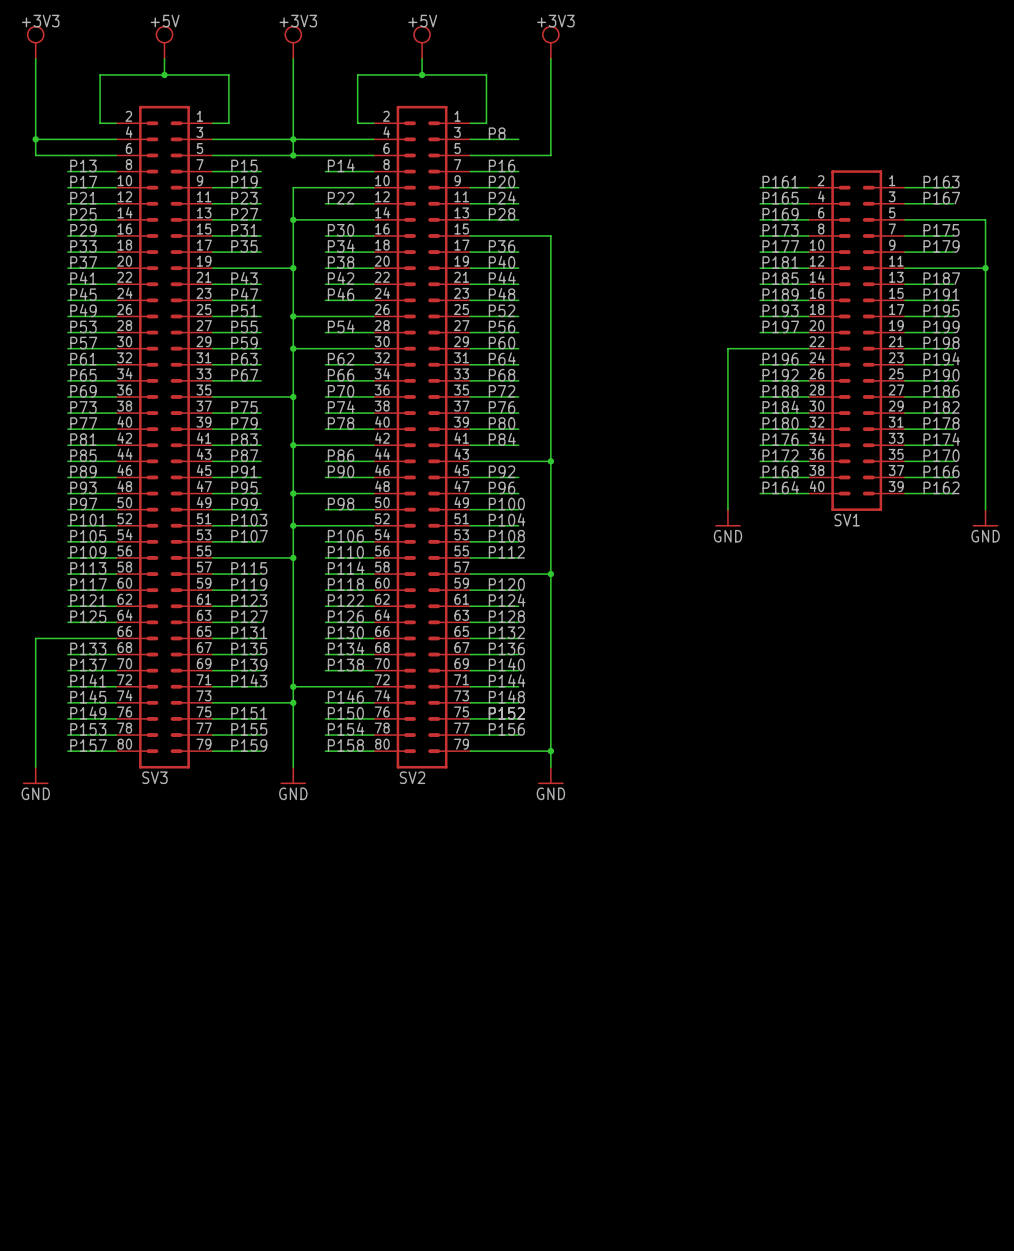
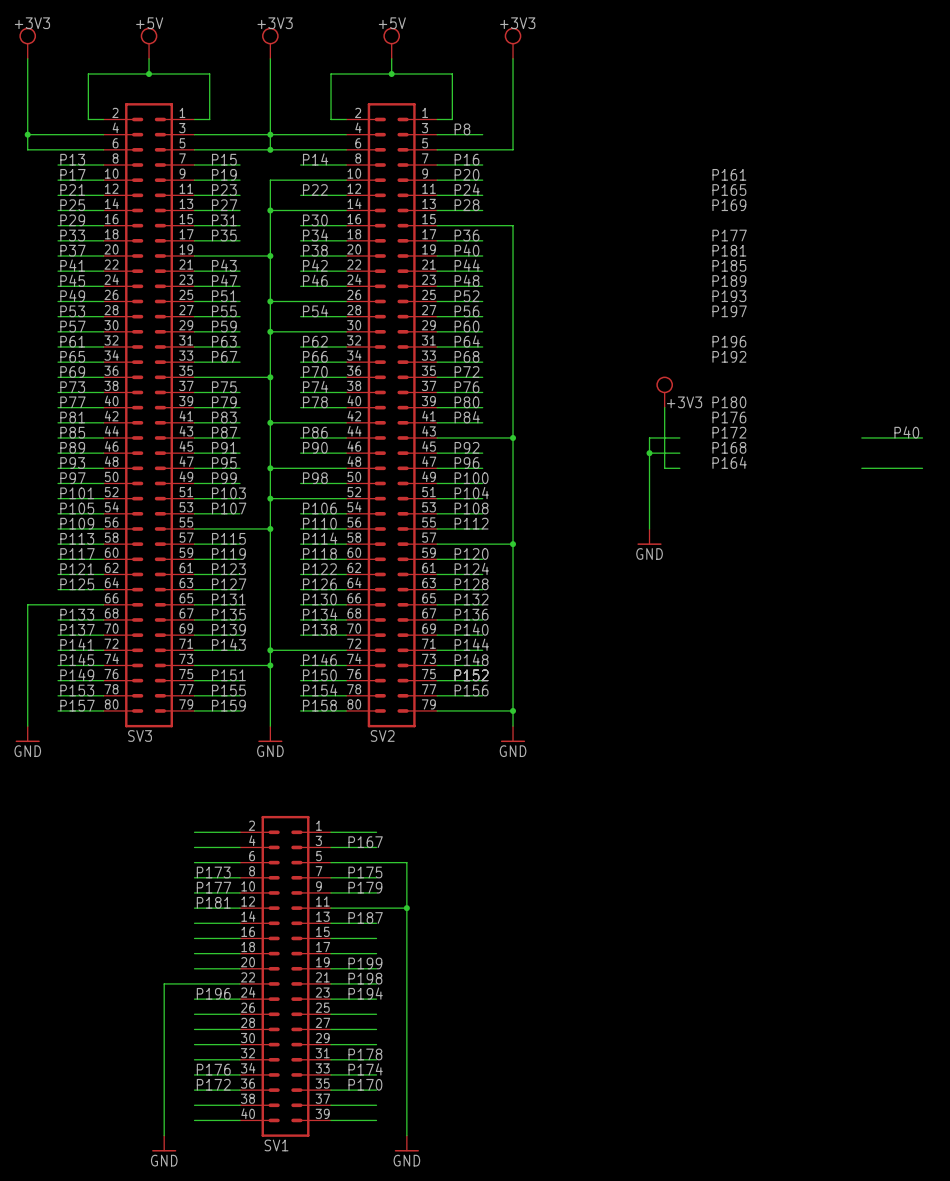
label: P163 (941, 182) -> none
wire: (760, 187) (808, 187) -> none
wire: (905, 187) (953, 187) -> none
label: P167 (941, 198) -> none
wire: (760, 203) (808, 203) -> none
wire: (905, 203) (953, 203) -> none
wire: (760, 219) (808, 219) -> none
wire: (905, 219) (985, 219) (985, 509) -> none
label: P173 (780, 230) -> none
label: P175 (941, 230) -> none
wire: (760, 235) (808, 235) -> none
wire: (905, 235) (953, 235) -> none
label: P179 (941, 246) -> none
wire: (760, 252) (808, 252) -> none
wire: (905, 252) (953, 252) -> none
wire: (760, 268) (808, 268) -> none
wire: (905, 268) (985, 268) -> none
junction: (985, 268) -> none
label: P187 (941, 278) -> none
wire: (760, 284) (808, 284) -> none
wire: (905, 284) (953, 284) -> none
label: P191 (941, 294) -> none
wire: (760, 300) (808, 300) -> none
wire: (905, 300) (953, 300) -> none
label: P195 (941, 310) -> none
wire: (760, 316) (808, 316) -> none
wire: (905, 316) (953, 316) -> none
label: P199 (941, 326) -> none
wire: (760, 332) (808, 332) -> none
wire: (905, 332) (953, 332) -> none
SV1 position: (856, 340) -> (285, 976)
label: P198 (941, 343) -> none
wire: (808, 348) (727, 348) (727, 509) -> none
wire: (905, 348) (953, 348) -> none
label: P194 (941, 358) -> none
wire: (760, 364) (808, 364) -> none
wire: (905, 364) (953, 364) -> none
label: P190 (941, 375) -> none
wire: (760, 380) (808, 380) -> none
wire: (905, 380) (953, 380) -> none
label: P188 (780, 391) -> none
label: P186 (941, 391) -> none
wire: (760, 396) (808, 396) -> none
wire: (905, 396) (953, 396) -> none
label: P184 (780, 407) -> none
label: P182 (941, 407) -> none
power symbol: none -> (664, 392)
wire: (760, 413) (808, 413) -> none
wire: (905, 413) (953, 413) -> none
label: none -> +3V3 (684, 402)
label: P178 (941, 423) -> none
wire: none -> (664, 407) (664, 468) (679, 468)
wire: (760, 429) (808, 429) -> none
wire: (905, 429) (953, 429) -> none
label: P174 (941, 439) -> none
wire: (760, 445) (808, 445) -> none
wire: (905, 445) (953, 445) -> none
label: P170 (941, 455) -> none
label: none -> P40 (906, 432)
wire: none -> (679, 437) (649, 437) (649, 528)
wire: (760, 461) (808, 461) -> none
wire: (905, 461) (921, 461) -> none
wire: none -> (892, 437) (922, 437)
label: P166 (941, 471) -> none
wire: none -> (649, 453) (679, 453)
junction: none -> (649, 453)
wire: (760, 477) (808, 477) -> none
wire: (905, 477) (953, 477) -> none
label: P162 (941, 487) -> none
wire: (760, 493) (808, 493) -> none
wire: (905, 493) (921, 493) -> none
wire: none -> (892, 468) (922, 468)
power symbol position: GND (727, 518) -> GND (649, 536)
power symbol: GND (985, 518) -> none
wire: none -> (194, 832) (240, 832)
wire: none -> (331, 832) (376, 832)
label: none -> P167 (365, 842)
wire: none -> (194, 847) (240, 847)
wire: none -> (331, 847) (376, 847)
wire: none -> (194, 862) (240, 862)
wire: none -> (331, 862) (406, 862) (406, 1135)
label: none -> P173 (213, 872)
label: none -> P175 (365, 872)
wire: none -> (194, 877) (240, 877)
wire: none -> (331, 877) (376, 877)
label: none -> P177 (213, 887)
label: none -> P179 (365, 887)
wire: none -> (194, 892) (240, 892)
wire: none -> (331, 892) (376, 892)
label: none -> P181 (213, 902)
wire: none -> (194, 908) (240, 908)
wire: none -> (331, 908) (406, 908)
junction: none -> (406, 908)
label: none -> P187 (365, 917)
wire: none -> (194, 923) (240, 923)
wire: none -> (331, 923) (376, 923)
wire: none -> (194, 938) (240, 938)
wire: none -> (331, 938) (376, 938)
wire: none -> (194, 953) (240, 953)
wire: none -> (331, 953) (376, 953)
label: none -> P199 (365, 963)
wire: none -> (194, 968) (240, 968)
wire: none -> (331, 968) (376, 968)
label: none -> P198 (365, 978)
wire: none -> (240, 983) (164, 983) (164, 1135)
wire: none -> (331, 983) (376, 983)
label: none -> P196 (213, 993)
label: none -> P194 (365, 993)
wire: none -> (194, 999) (240, 999)
wire: none -> (331, 999) (376, 999)
wire: none -> (194, 1014) (240, 1014)
wire: none -> (331, 1014) (376, 1014)
wire: none -> (194, 1029) (240, 1029)
wire: none -> (331, 1029) (376, 1029)
wire: none -> (194, 1044) (240, 1044)
wire: none -> (331, 1044) (376, 1044)
label: none -> P178 (365, 1054)
wire: none -> (194, 1059) (240, 1059)
wire: none -> (331, 1059) (376, 1059)
label: none -> P176 (213, 1069)
label: none -> P174 (365, 1069)
wire: none -> (194, 1074) (240, 1074)
wire: none -> (331, 1074) (376, 1074)
label: none -> P172 (213, 1084)
label: none -> P170 (365, 1084)
wire: none -> (194, 1090) (240, 1090)
wire: none -> (331, 1090) (376, 1090)
wire: none -> (194, 1105) (240, 1105)
wire: none -> (331, 1105) (376, 1105)
wire: none -> (194, 1120) (240, 1120)
wire: none -> (331, 1120) (376, 1120)
power symbol: none -> GND (164, 1143)
power symbol: none -> GND (406, 1143)

